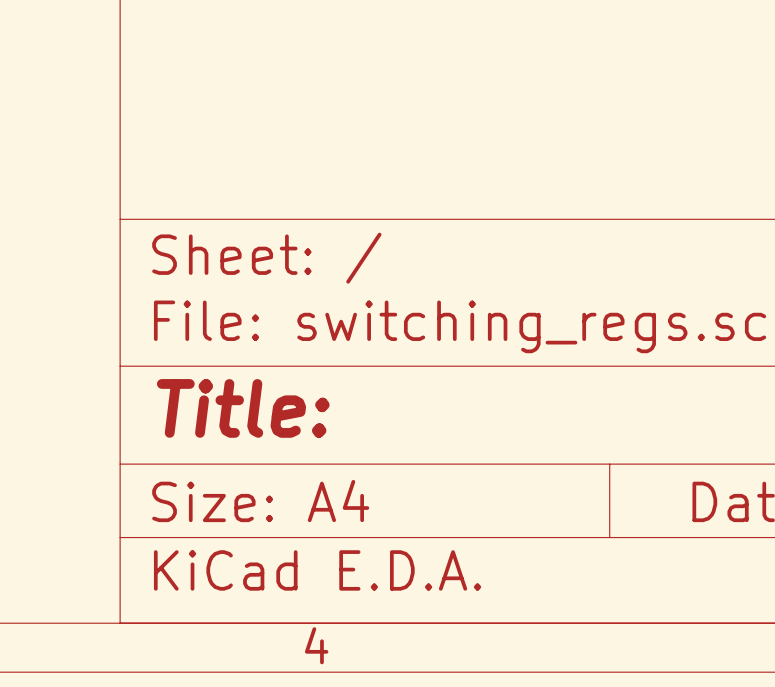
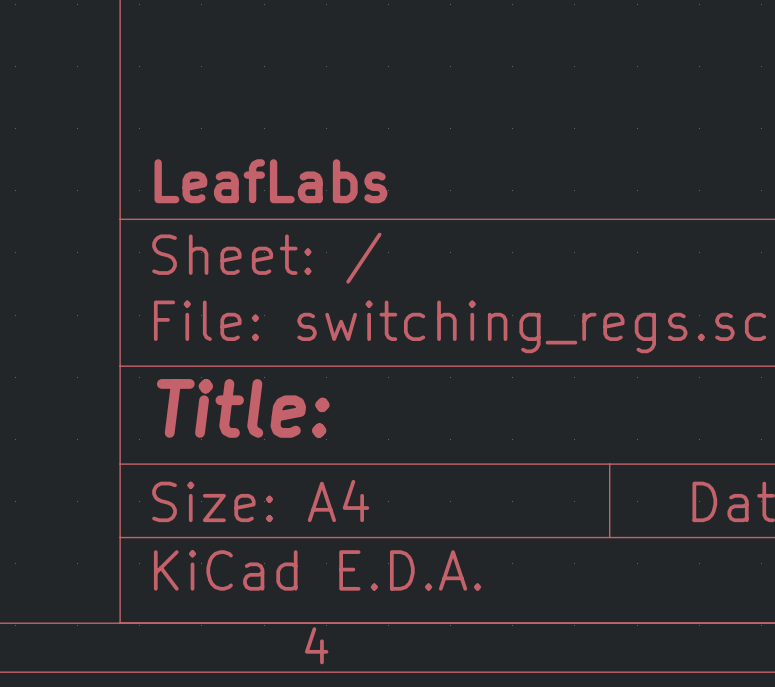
title block: none -> LeafLabs (270, 181)

